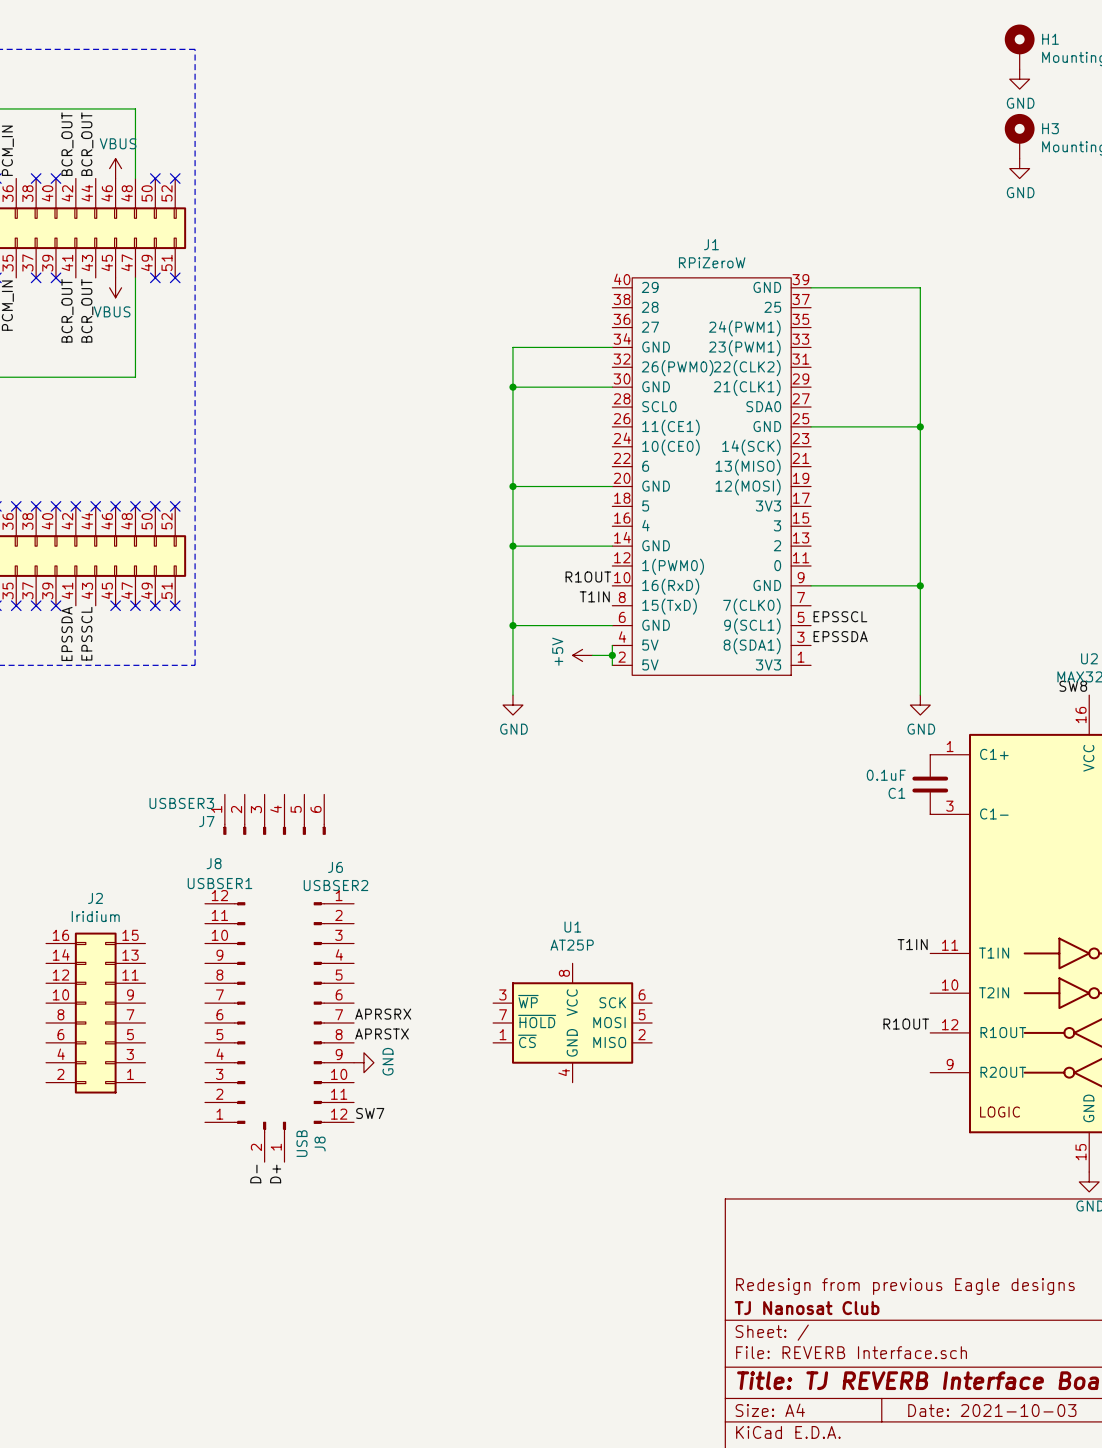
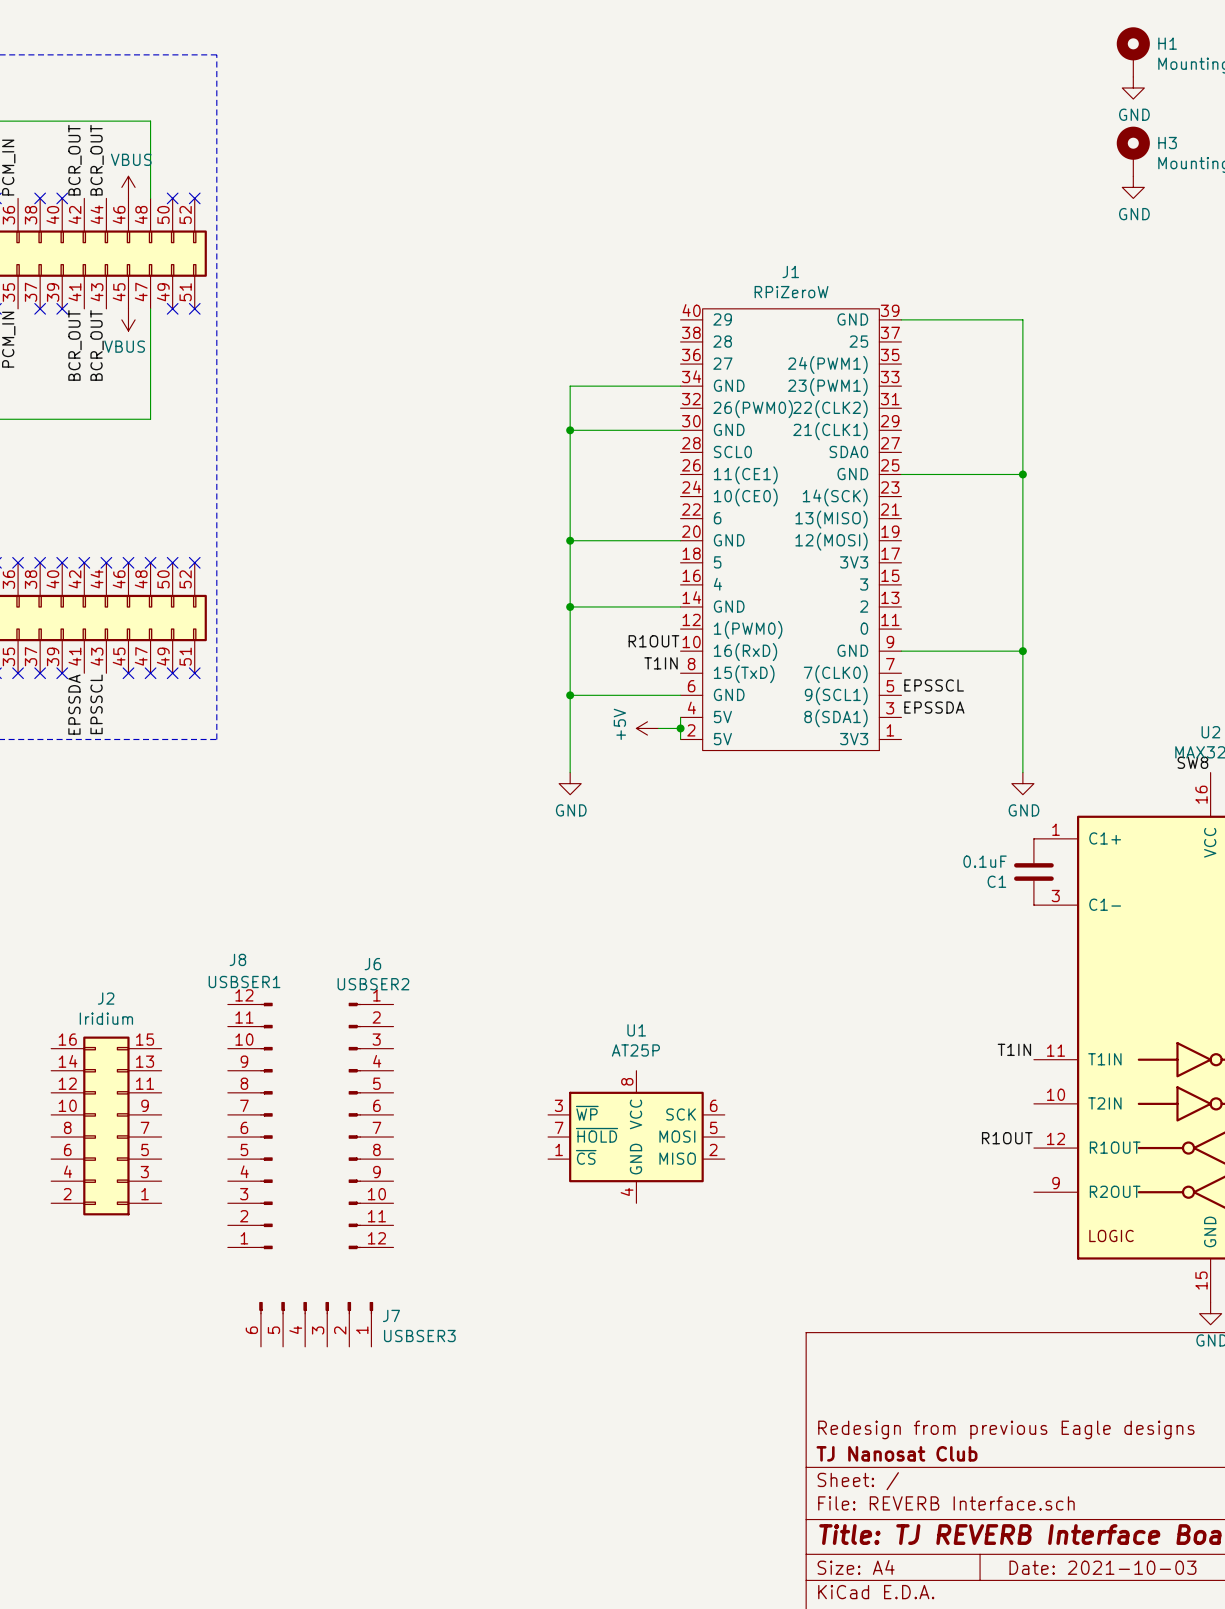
J7 position: (274, 814) -> (316, 1324)
J7 rotation: 0° (274, 829) -> 180° (316, 1308)
label: APRSRX (383, 1014) -> none
label: APRSTX (382, 1034) -> none
power symbol: GND (363, 1062) -> none
label: SW7 (370, 1113) -> none
J8: USB (274, 1141) -> none
label: D- (255, 1173) -> none
label: D+ (275, 1173) -> none

